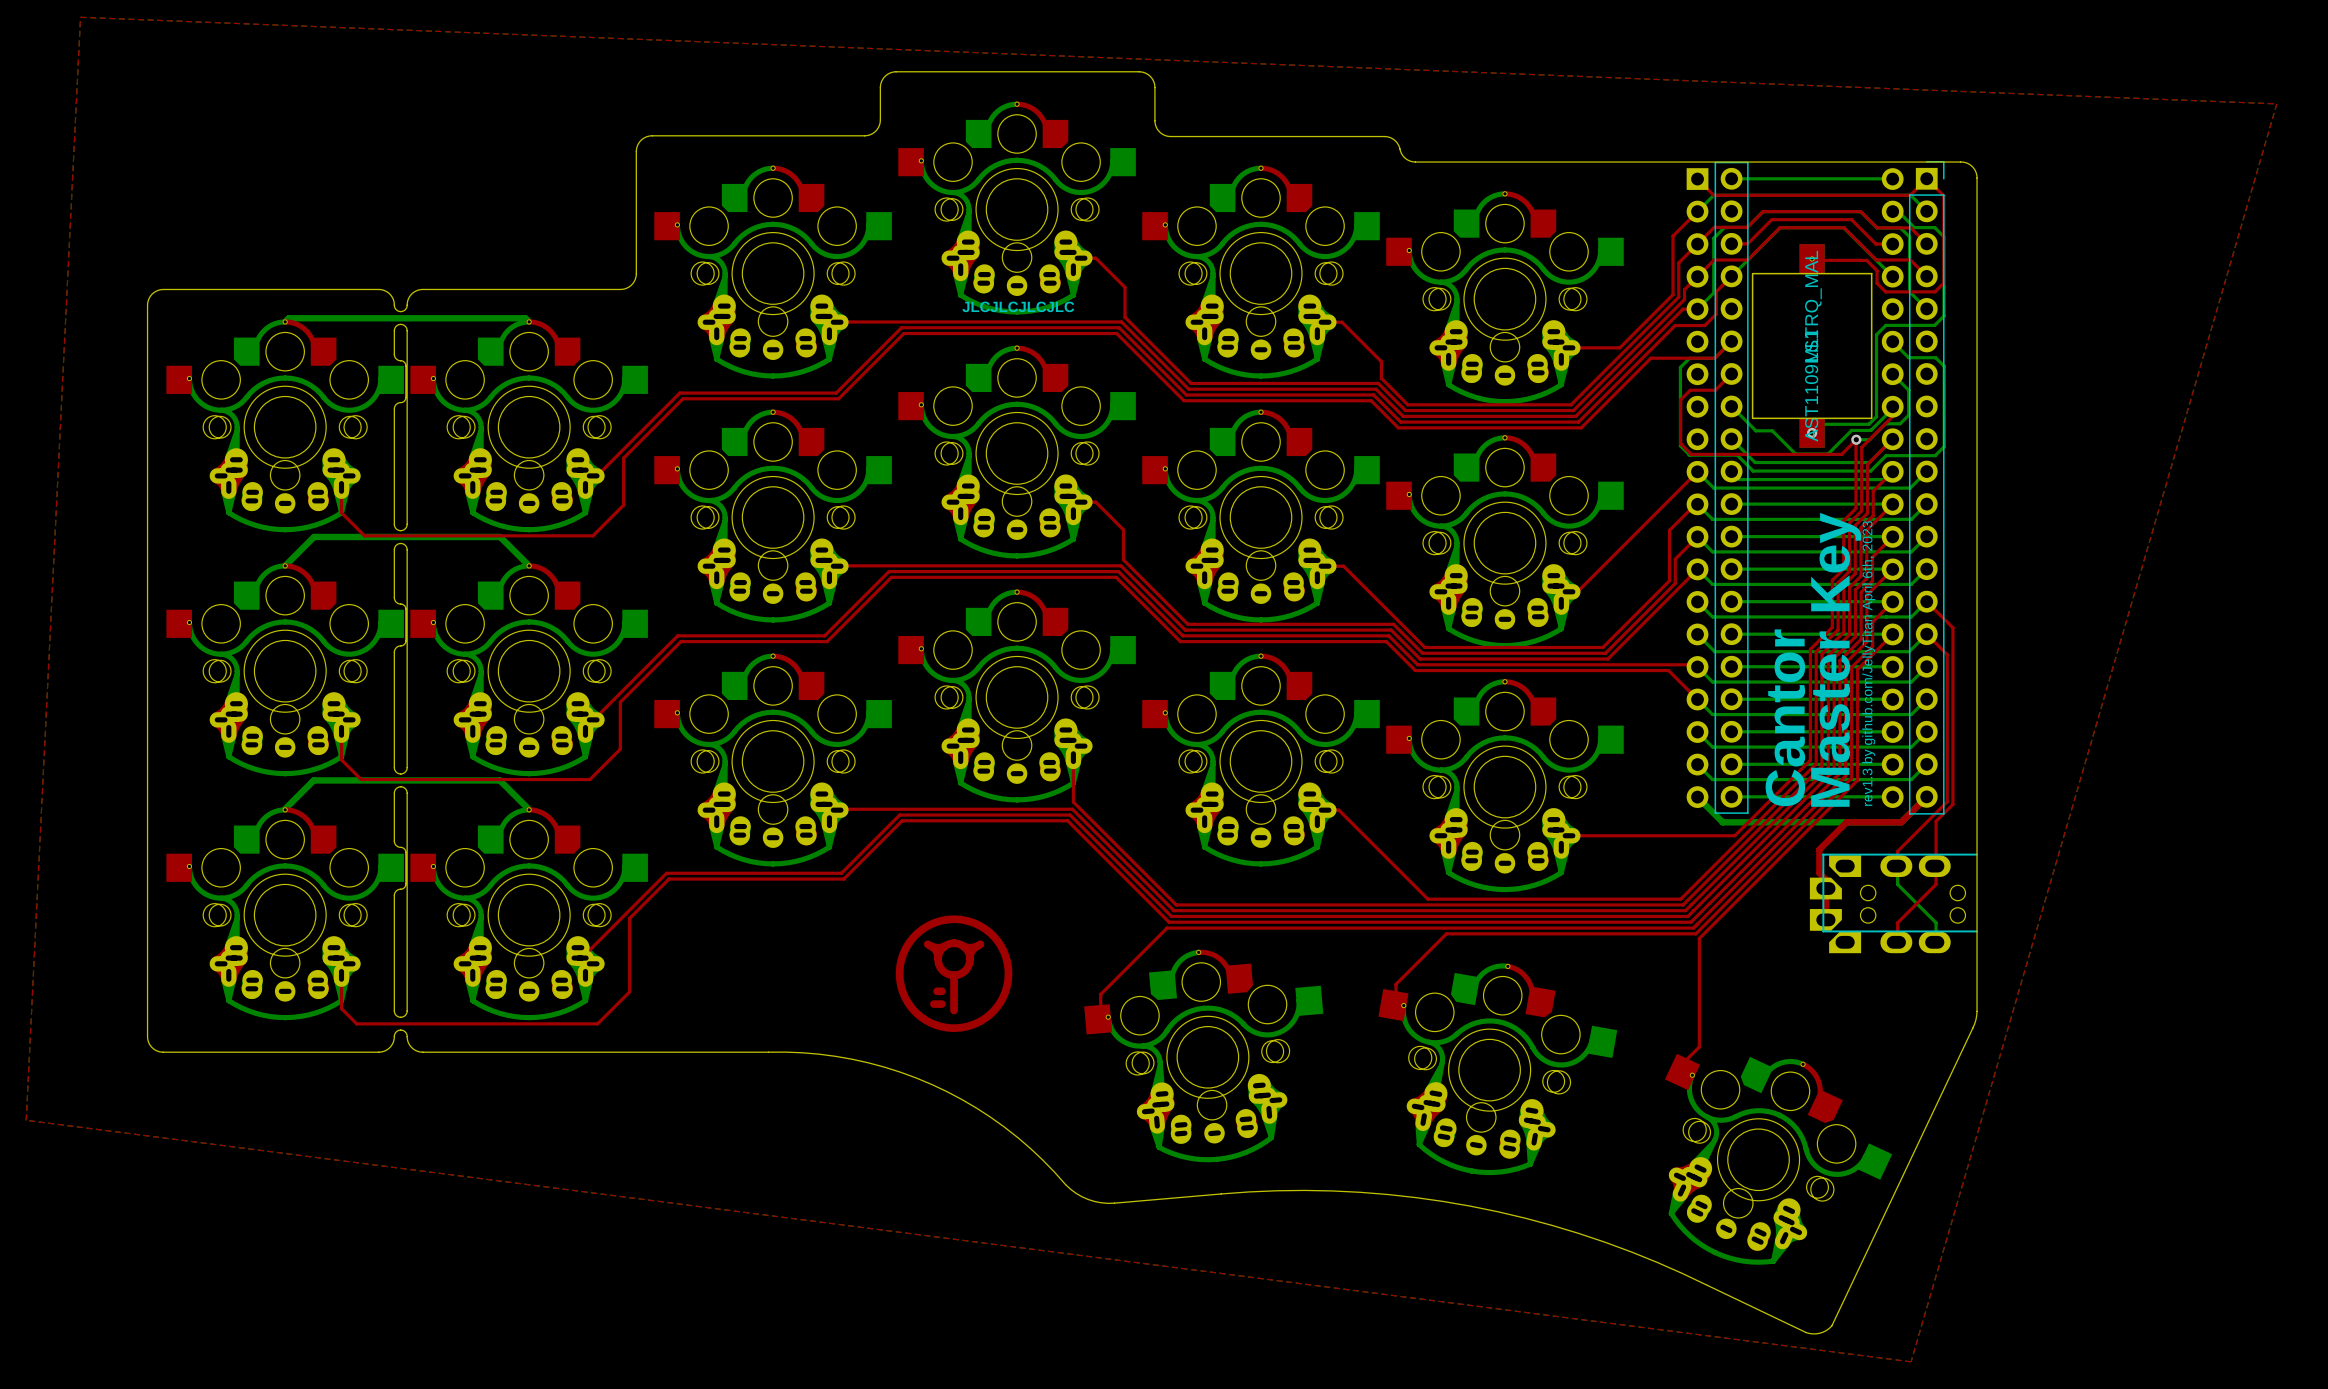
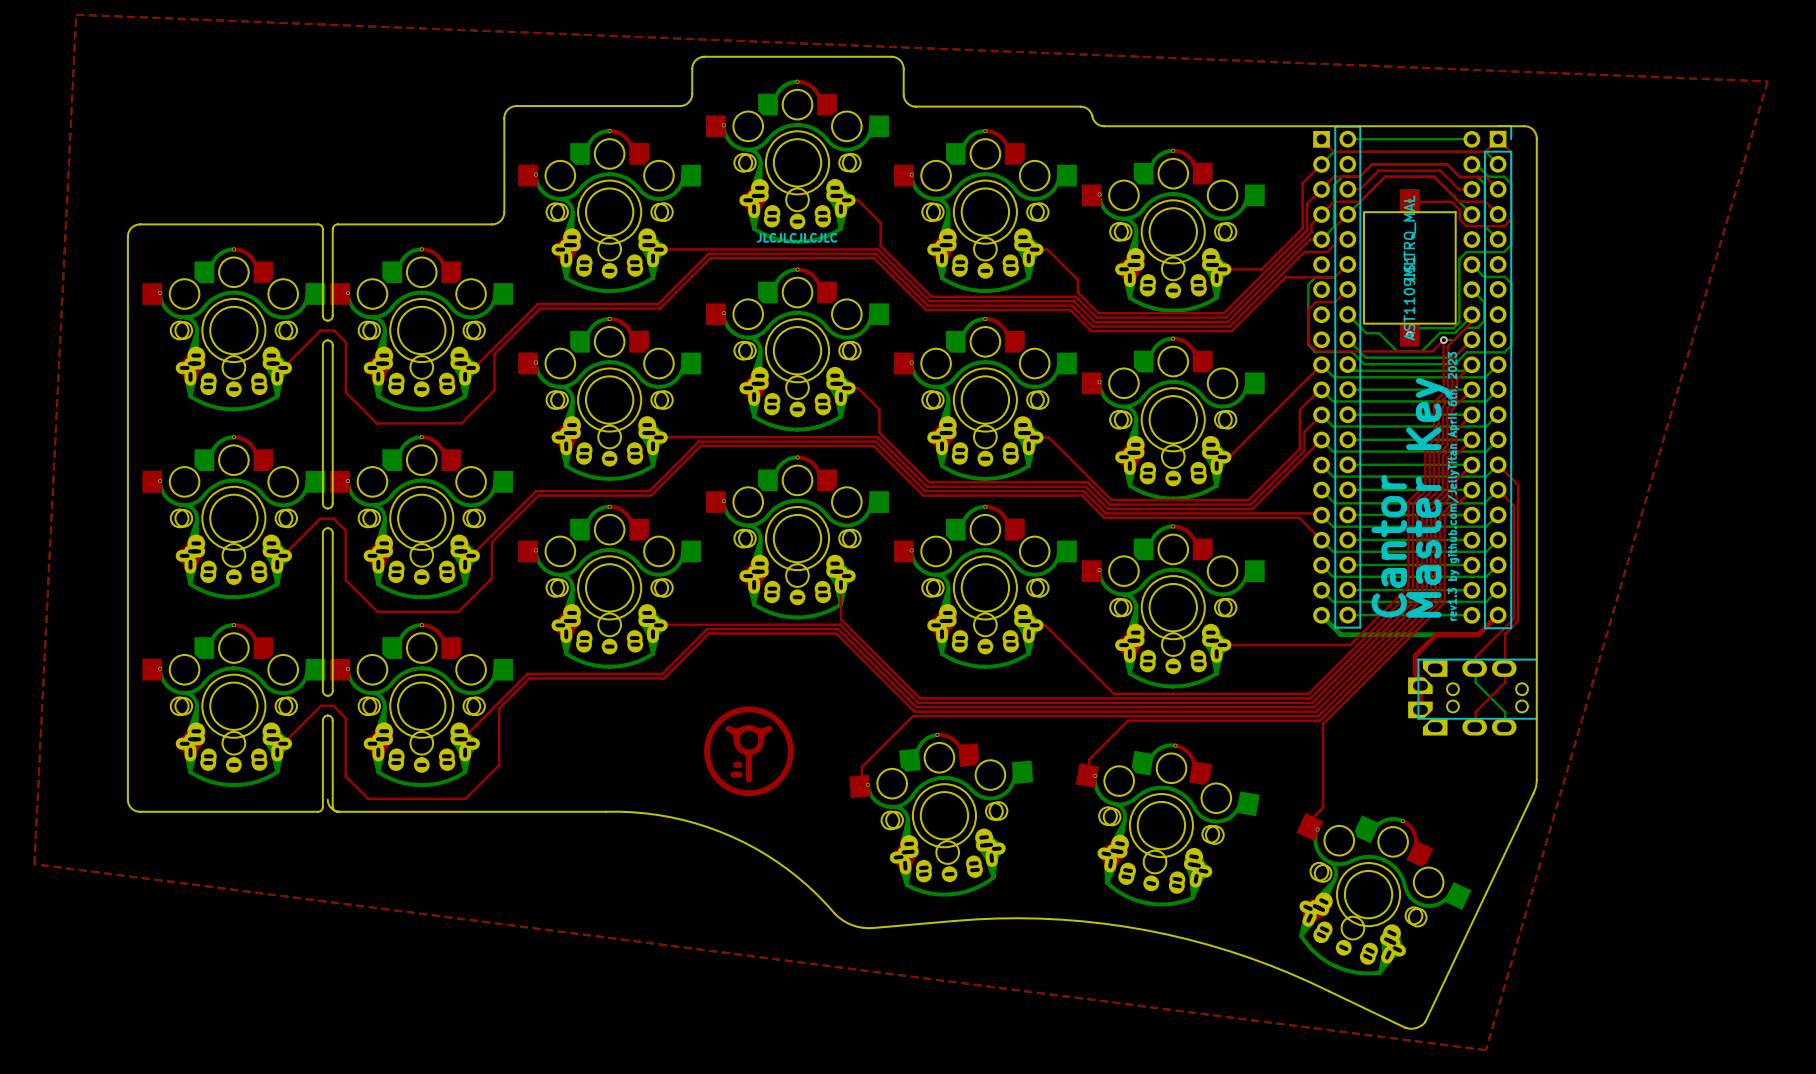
board edge: (378, 289) (389, 293) (394, 305) -> none
board edge: (422, 289) (415, 291) (410, 295) (404, 310) (397, 310) (394, 305) -> (339, 224) (335, 225) (332, 228) (332, 315) (327, 320) (322, 315) (322, 228) (319, 224) (305, 224)
bottom track: (285, 321) (288, 318) (525, 318) (529, 321) -> none
board edge: (400, 324) (405, 326) (407, 330) (407, 524) (405, 528) (400, 530) (396, 528) (394, 524) (394, 408) (396, 403) (404, 401) (405, 397) (405, 364) (403, 361) (396, 359) (394, 355) (394, 329) (400, 324) -> none
board edge: none -> (327, 340) (322, 345) (322, 503) (327, 508) (332, 503) (332, 345) (327, 340)
top track: (341, 487) (341, 512) (364, 535) (592, 535) -> (283, 367) (320, 330) (334, 330) (346, 342) (346, 392) (376, 423) (461, 423) (470, 414)
board edge: (400, 543) (405, 545) (407, 549) (407, 767) (405, 772) (400, 773) (396, 772) (394, 767) (394, 651) (396, 647) (404, 644) (405, 640) (405, 608) (403, 604) (396, 602) (394, 597) (394, 549) (396, 544) (400, 543) -> none
bottom track: (285, 565) (314, 536) (500, 536) (529, 565) -> none
board edge: none -> (327, 528) (322, 533) (322, 690) (327, 695) (332, 690) (332, 533) (327, 528)
top track: (341, 731) (341, 759) (361, 779) (589, 779) -> (283, 555) (320, 518) (333, 518) (345, 530) (345, 580) (377, 611) (458, 611) (468, 601)
board edge: (400, 786) (405, 788) (407, 793) (407, 1010) (405, 1015) (400, 1017) (396, 1015) (394, 1010) (394, 894) (396, 890) (404, 887) (405, 884) (405, 851) (403, 848) (396, 845) (394, 840) (394, 792) (396, 788) (400, 786) -> none
bottom track: (284, 809) (313, 780) (499, 780) (528, 809) -> none
top track: (341, 975) (341, 1008) (356, 1023) (597, 1023) -> (283, 743) (321, 705) (333, 705) (345, 718) (345, 776) (368, 798) (465, 798) (474, 789)
board edge: (407, 1036) (403, 1030) (397, 1031) (390, 1046) (385, 1050) (378, 1052) -> (339, 811) (335, 811) (332, 807) (332, 720) (327, 715) (322, 720) (322, 807) (319, 811) (305, 811)

